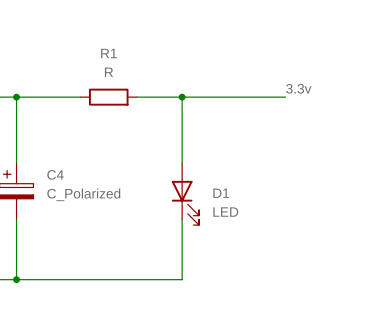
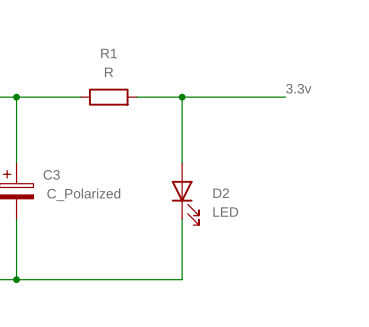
C4 name: C4 (55, 174) -> C3 (51, 174)
D1 name: D1 (221, 193) -> D2 (221, 193)

